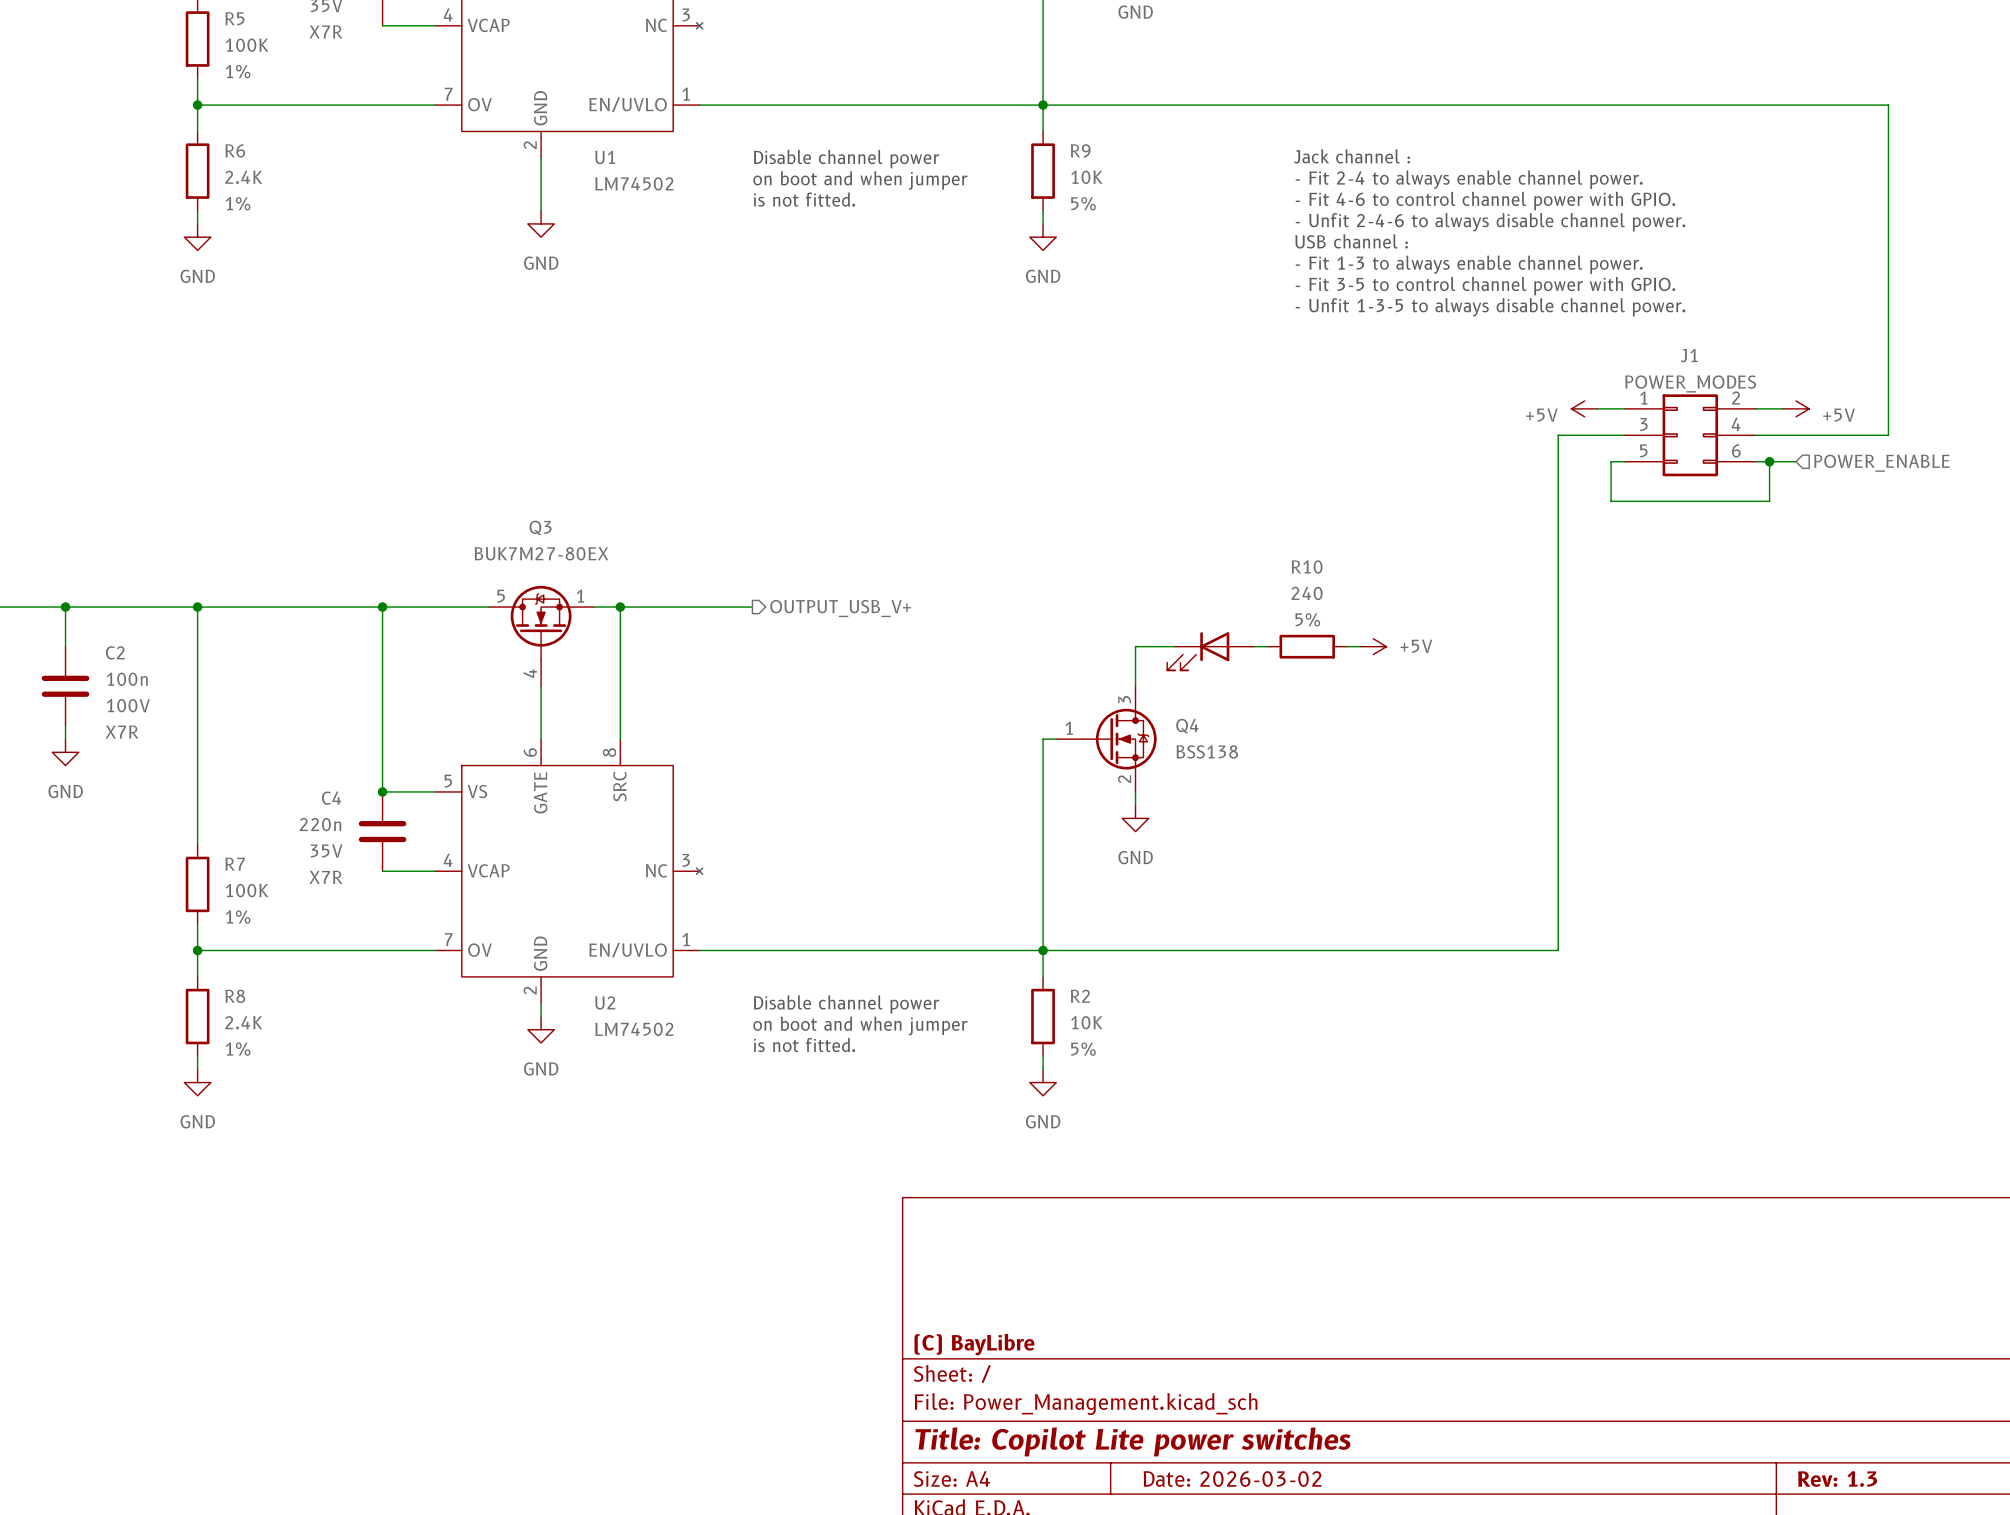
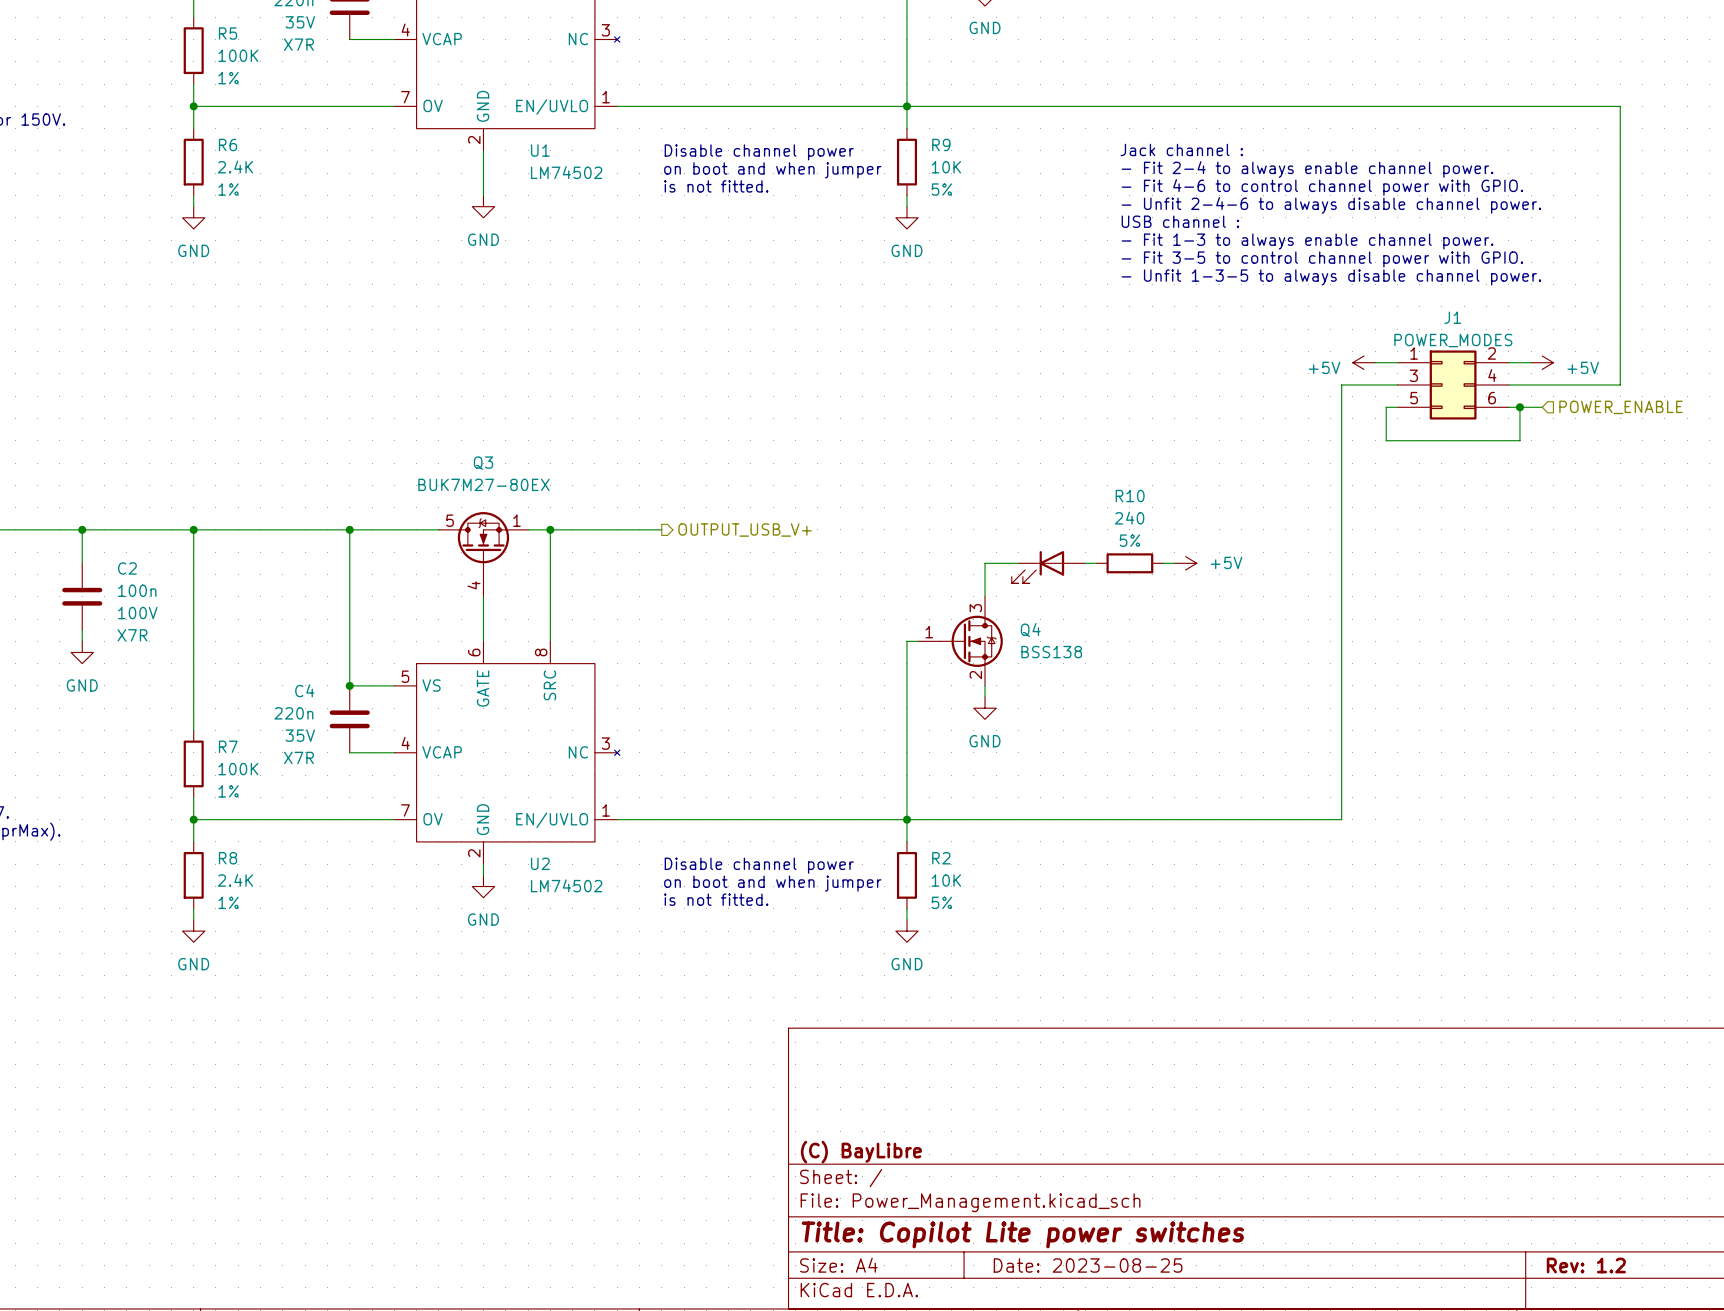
title block: Date: 2026-03-02 (1232, 1479) -> Date: 2023-08-25 (1088, 1265)
title block: Rev: 1.3 (1837, 1479) -> Rev: 1.2 (1586, 1265)

